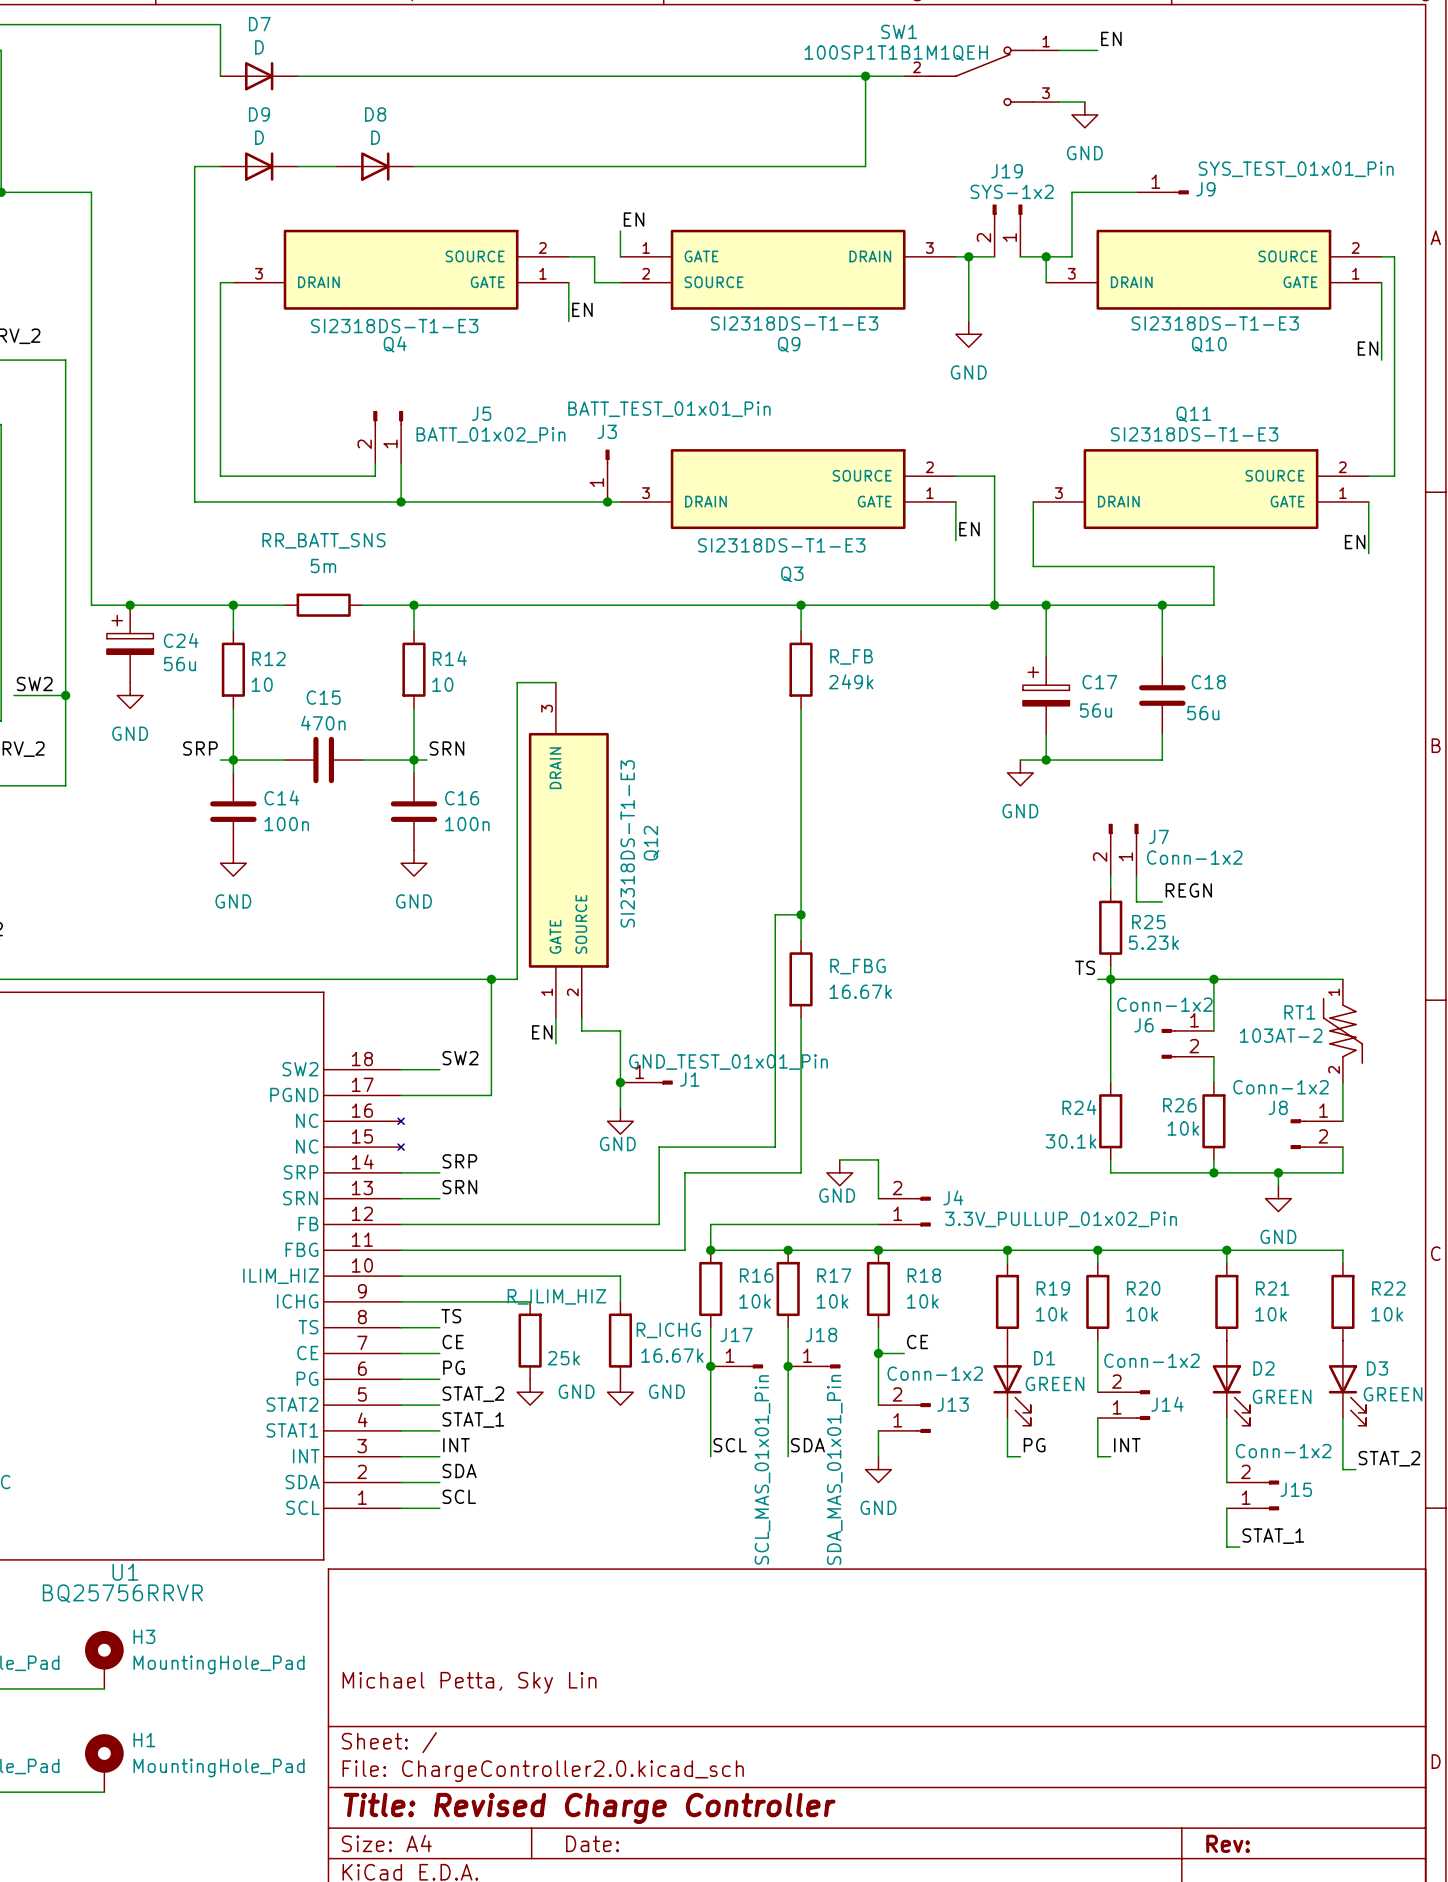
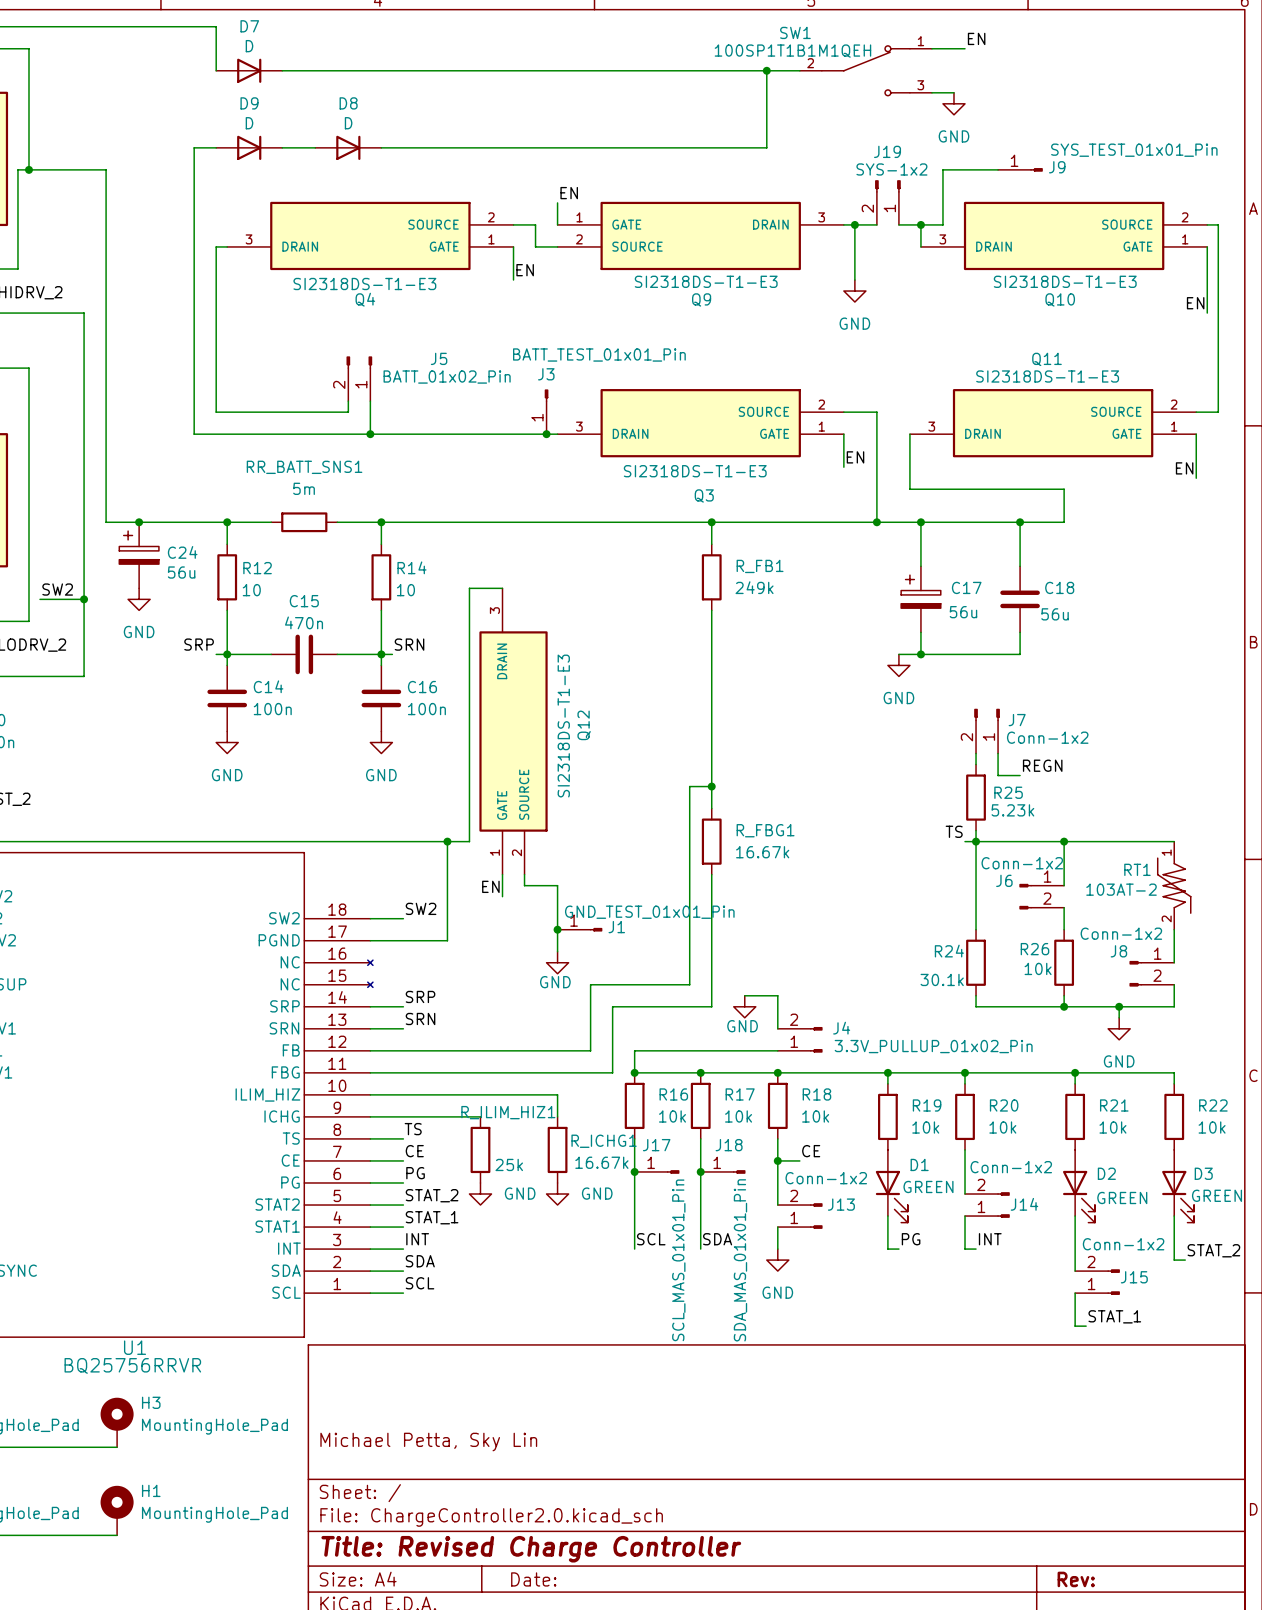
RR_BATT_SNS name: RR_BATT_SNS (324, 540) -> RR_BATT_SNS1 (304, 467)
R_FB name: R_FB (851, 656) -> R_FB1 (760, 566)
R_FBG name: R_FBG (857, 966) -> R_FBG1 (765, 830)
R_ILIM_HIZ name: R_ILIM_HIZ (556, 1296) -> R_ILIM_HIZ1 (508, 1112)
R_ICHG name: R_ICHG (668, 1330) -> R_ICHG1 (604, 1141)

